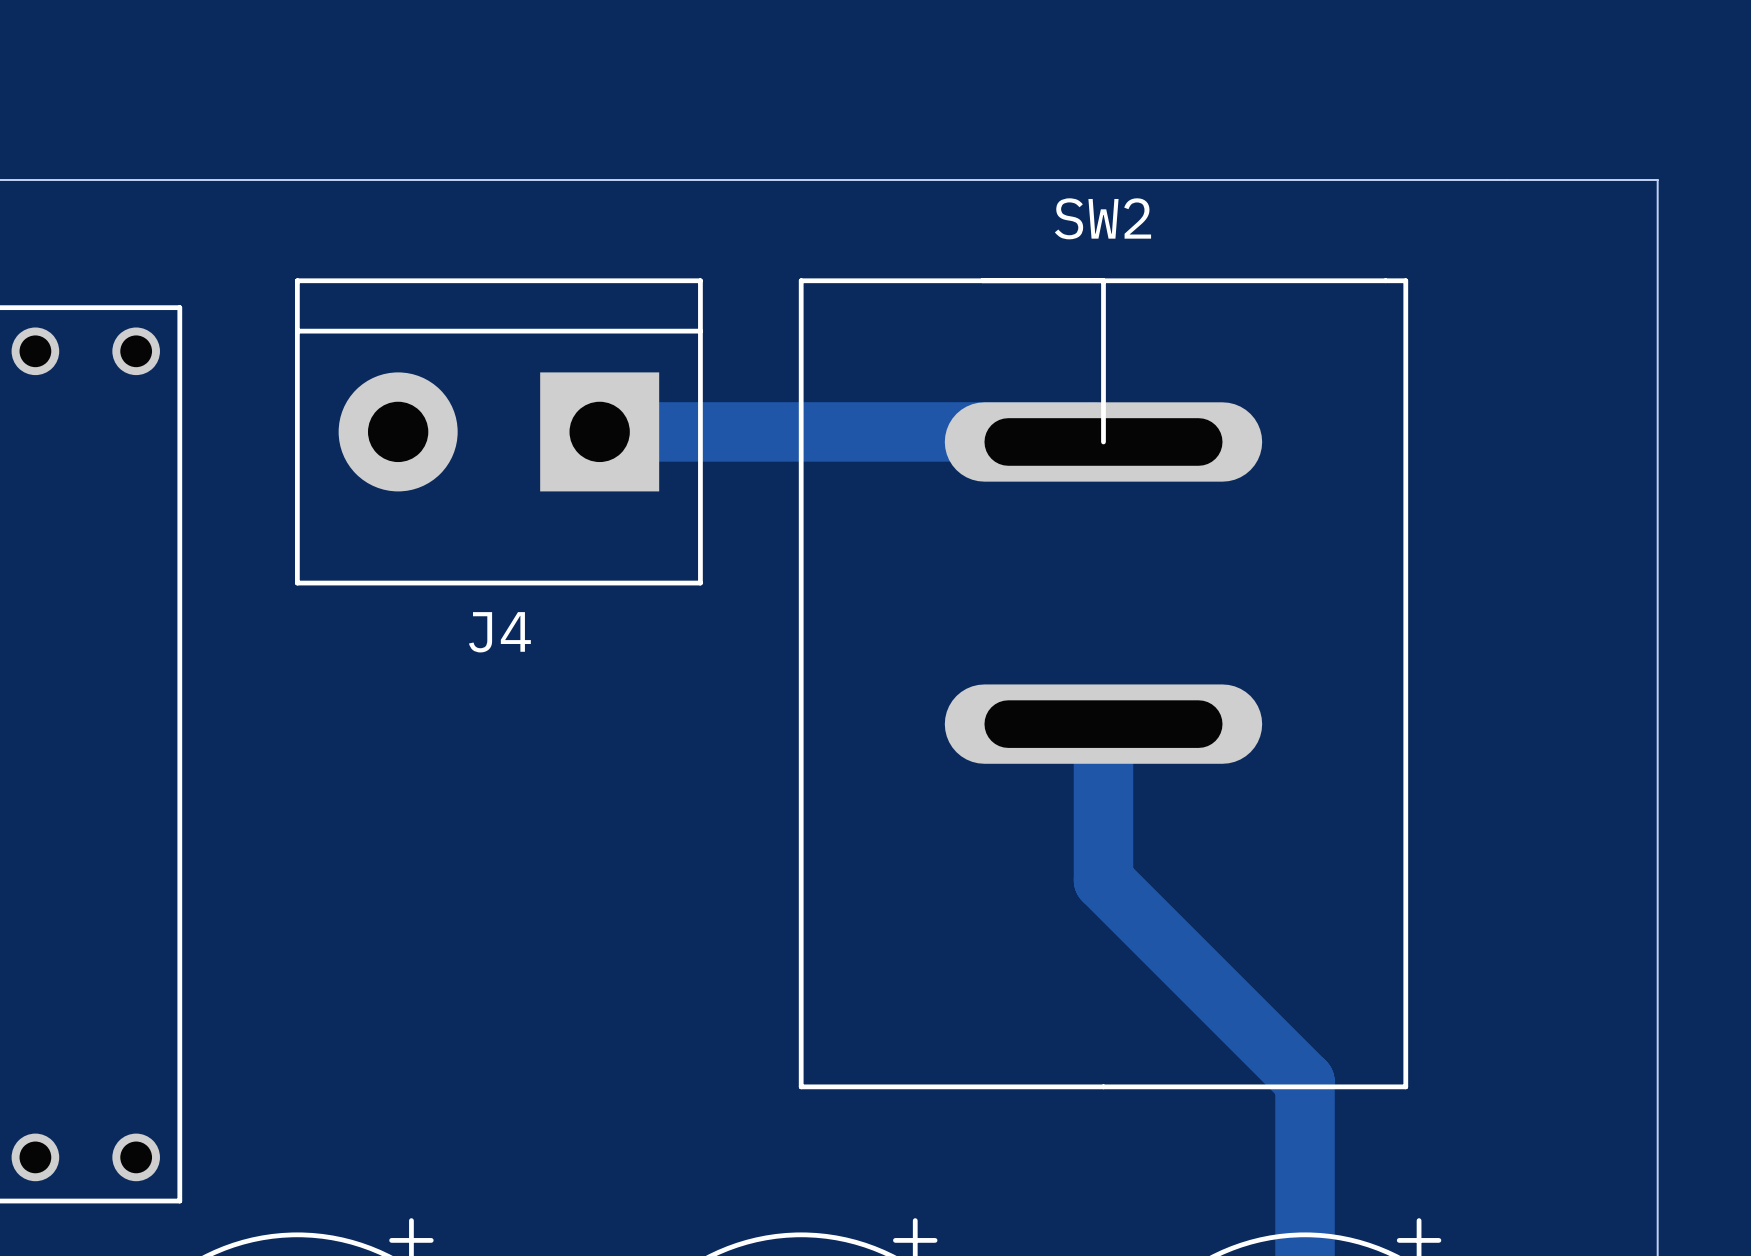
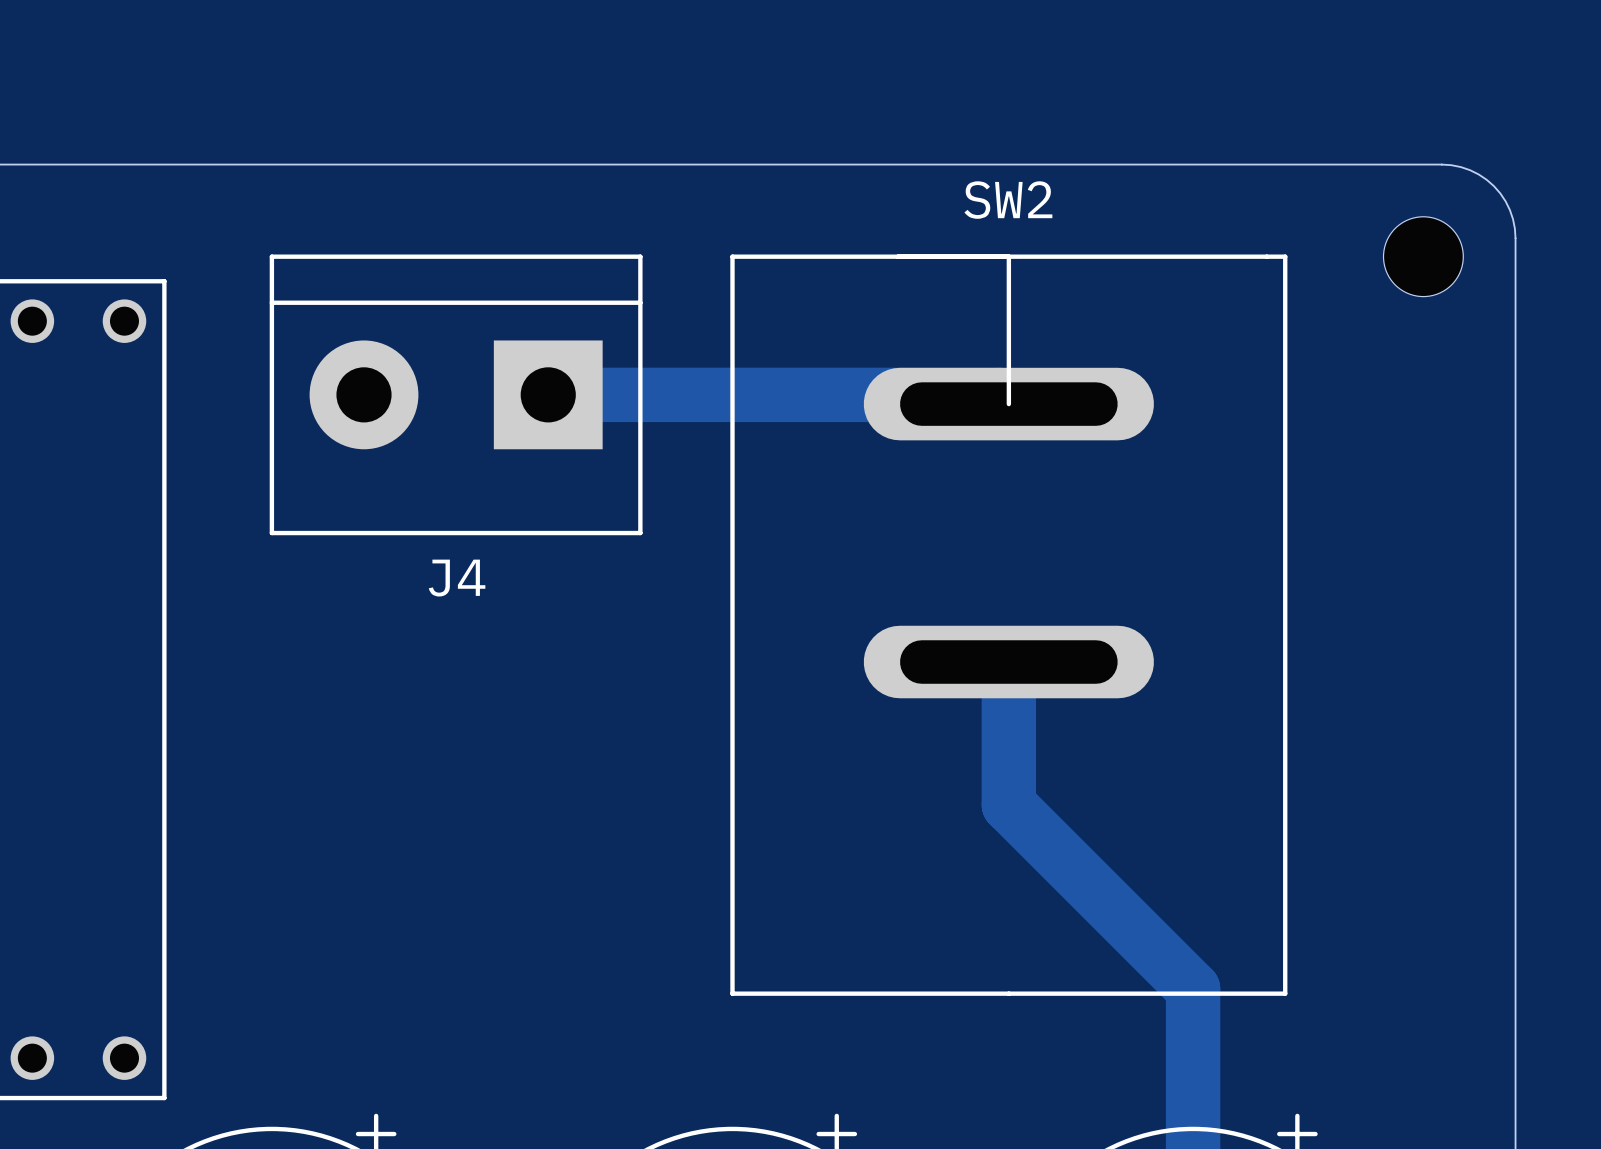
board edge: (1577, 179) (1657, 179) (1657, 260) -> (1441, 164) (1470, 170) (1493, 186) (1509, 210) (1515, 238)
part: none -> (1423, 256)

